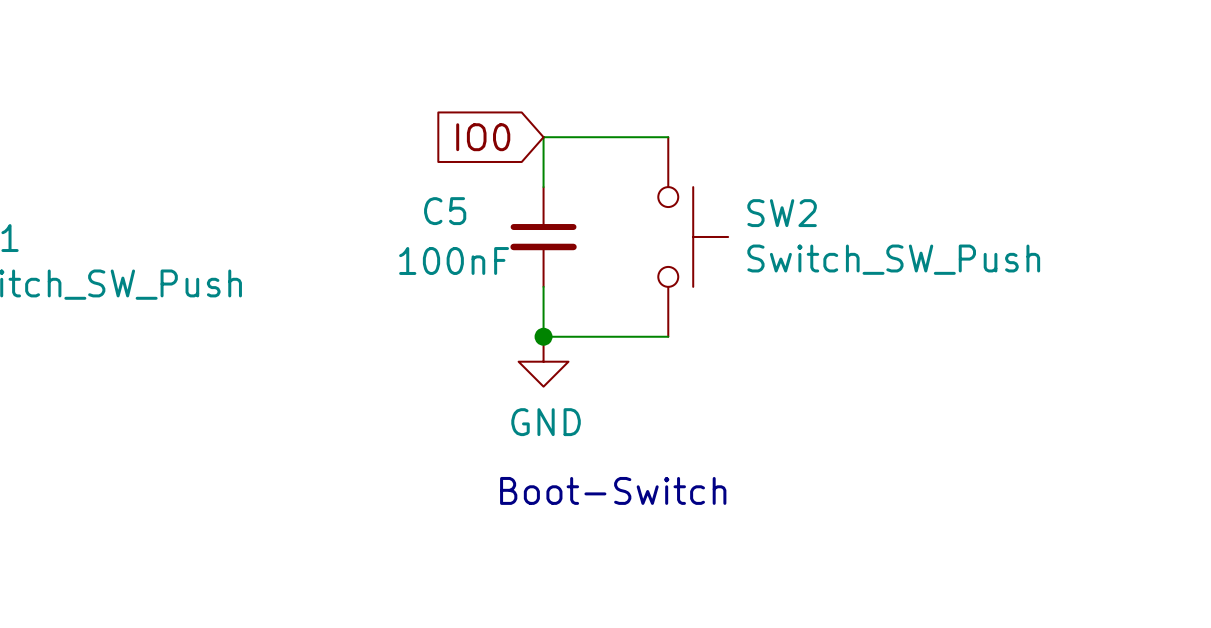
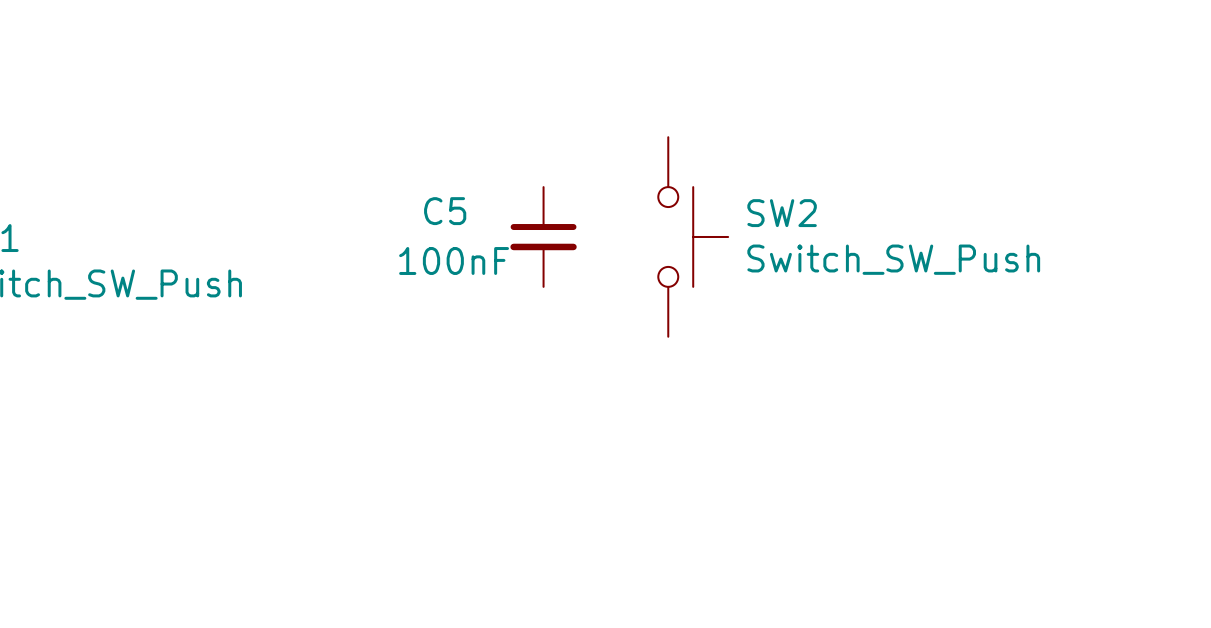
global label: IO0 (483, 137) -> none
wire: (668, 137) (543, 137) (543, 187) -> none
wire: (543, 286) (543, 336) (668, 336) -> none
junction: (543, 336) -> none
power symbol: GND (543, 361) -> none
text: Boot-Switch (613, 490) -> none

